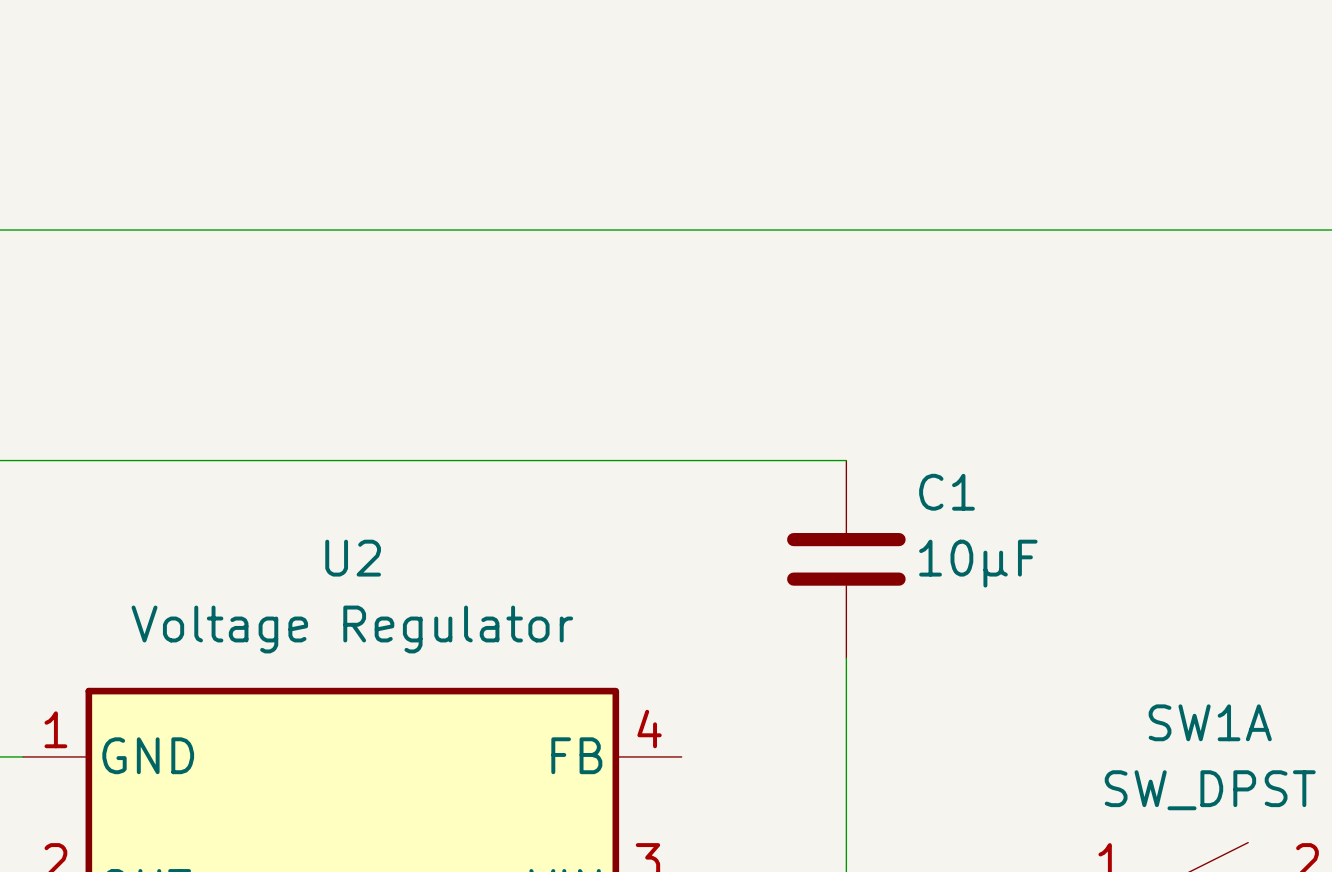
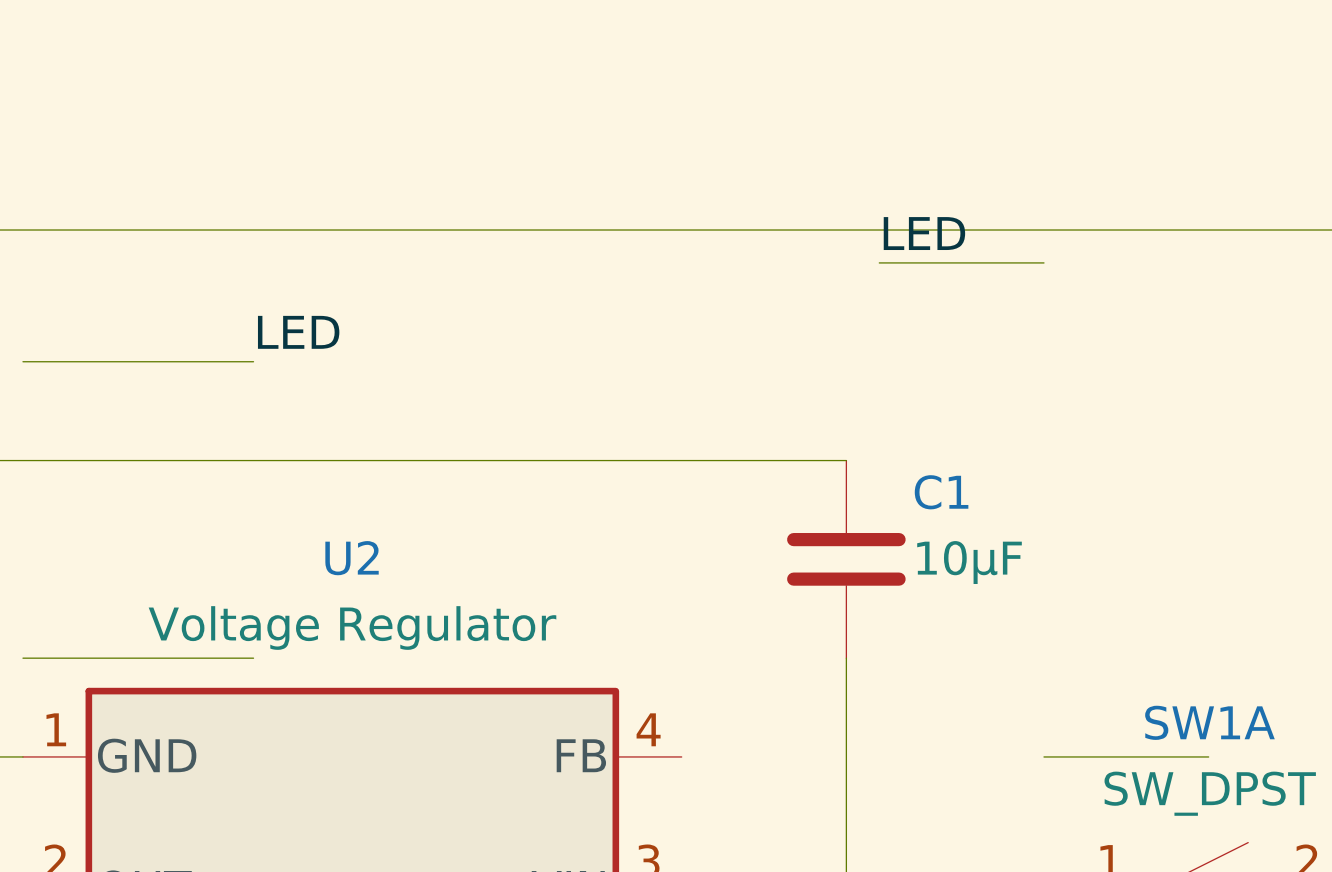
label: none -> LED (924, 233)
wire: none -> (879, 262) (1043, 262)
label: none -> LED (298, 332)
wire: none -> (22, 361) (253, 361)
wire: none -> (22, 658) (253, 658)
wire: none -> (1043, 756) (1208, 756)

